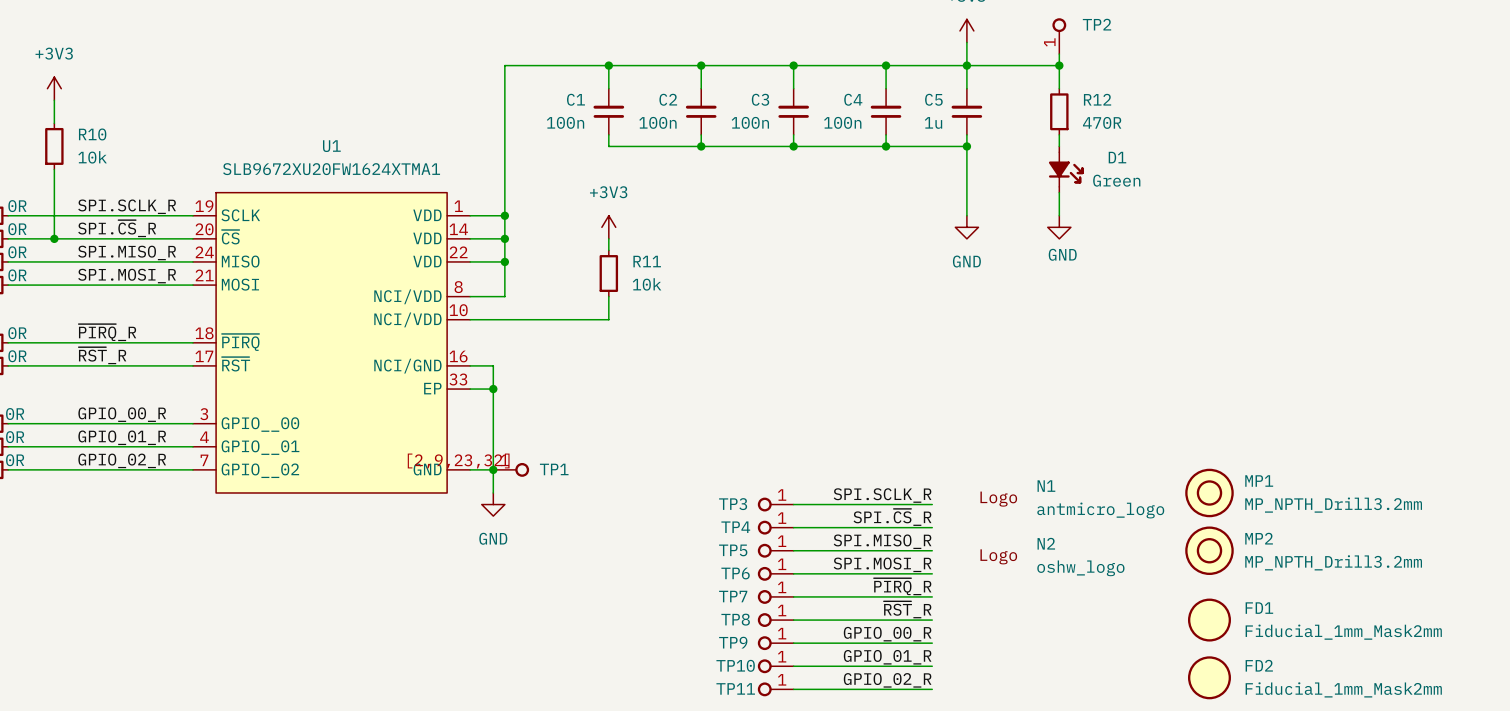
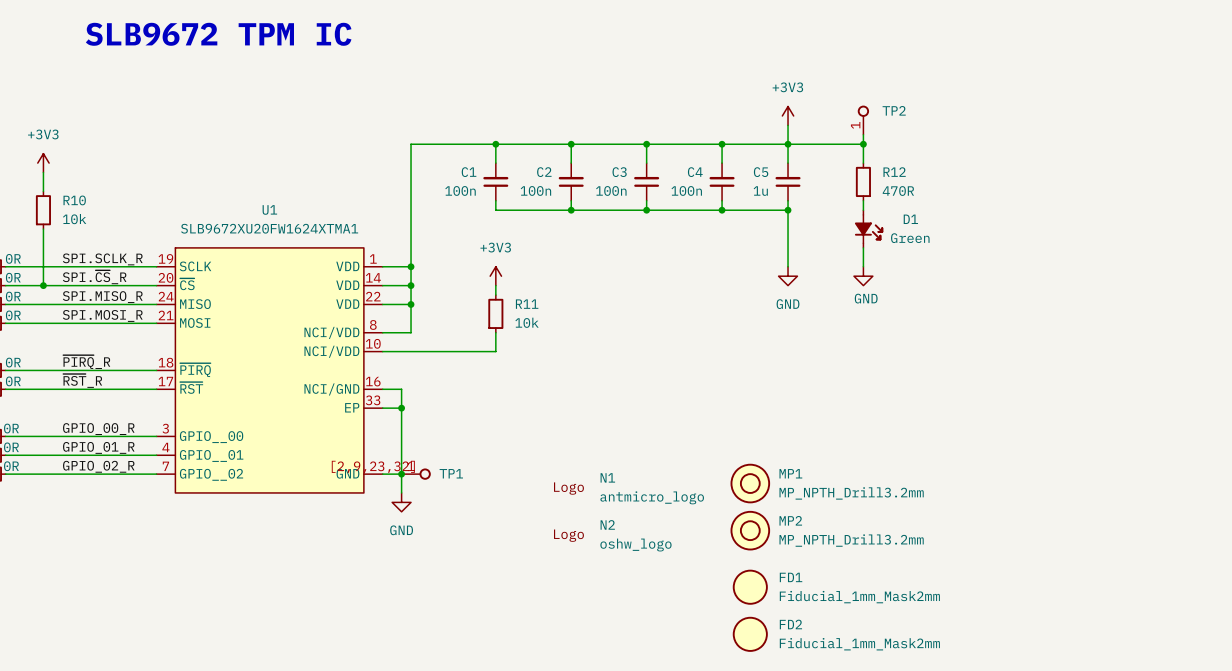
MP1 position: (1209, 492) -> (750, 483)
label: SPI.SCLK_R (882, 495) -> none
N1 position: (1072, 499) -> (628, 488)
TP3: (775, 504) -> none
wire: (793, 504) (932, 504) -> none
label: SPI.~{CS}_R (892, 517) -> none
TP4: (775, 527) -> none
wire: (793, 527) (932, 527) -> none
label: SPI.MISO_R (882, 541) -> none
TP5: (775, 550) -> none
wire: (793, 550) (932, 550) -> none
MP2 position: (1209, 550) -> (750, 530)
N2 position: (1052, 557) -> (612, 535)
label: SPI.MOSI_R (882, 564) -> none
TP6: (775, 573) -> none
wire: (793, 573) (932, 573) -> none
label: ~{PIRQ}_R (902, 586) -> none
TP7: (775, 596) -> none
wire: (793, 596) (932, 596) -> none
label: ~{RST}_R (907, 609) -> none
TP8: (775, 620) -> none
wire: (793, 620) (932, 620) -> none
FD1 position: (1209, 620) -> (750, 587)
label: GPIO_00_R (887, 634) -> none
TP9: (775, 643) -> none
wire: (793, 643) (932, 643) -> none
label: GPIO_01_R (887, 657) -> none
TP10: (775, 666) -> none
wire: (793, 666) (932, 666) -> none
FD2 position: (1209, 677) -> (750, 634)
label: GPIO_02_R (887, 680) -> none
TP11: (775, 689) -> none
wire: (793, 689) (932, 689) -> none

